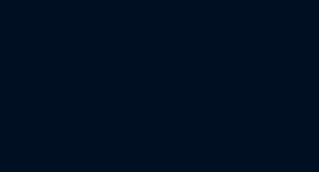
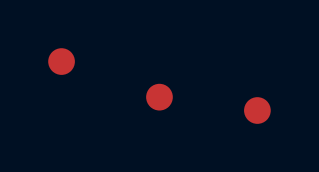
part: none -> (61, 61)
part: none -> (159, 97)
part: none -> (257, 110)

